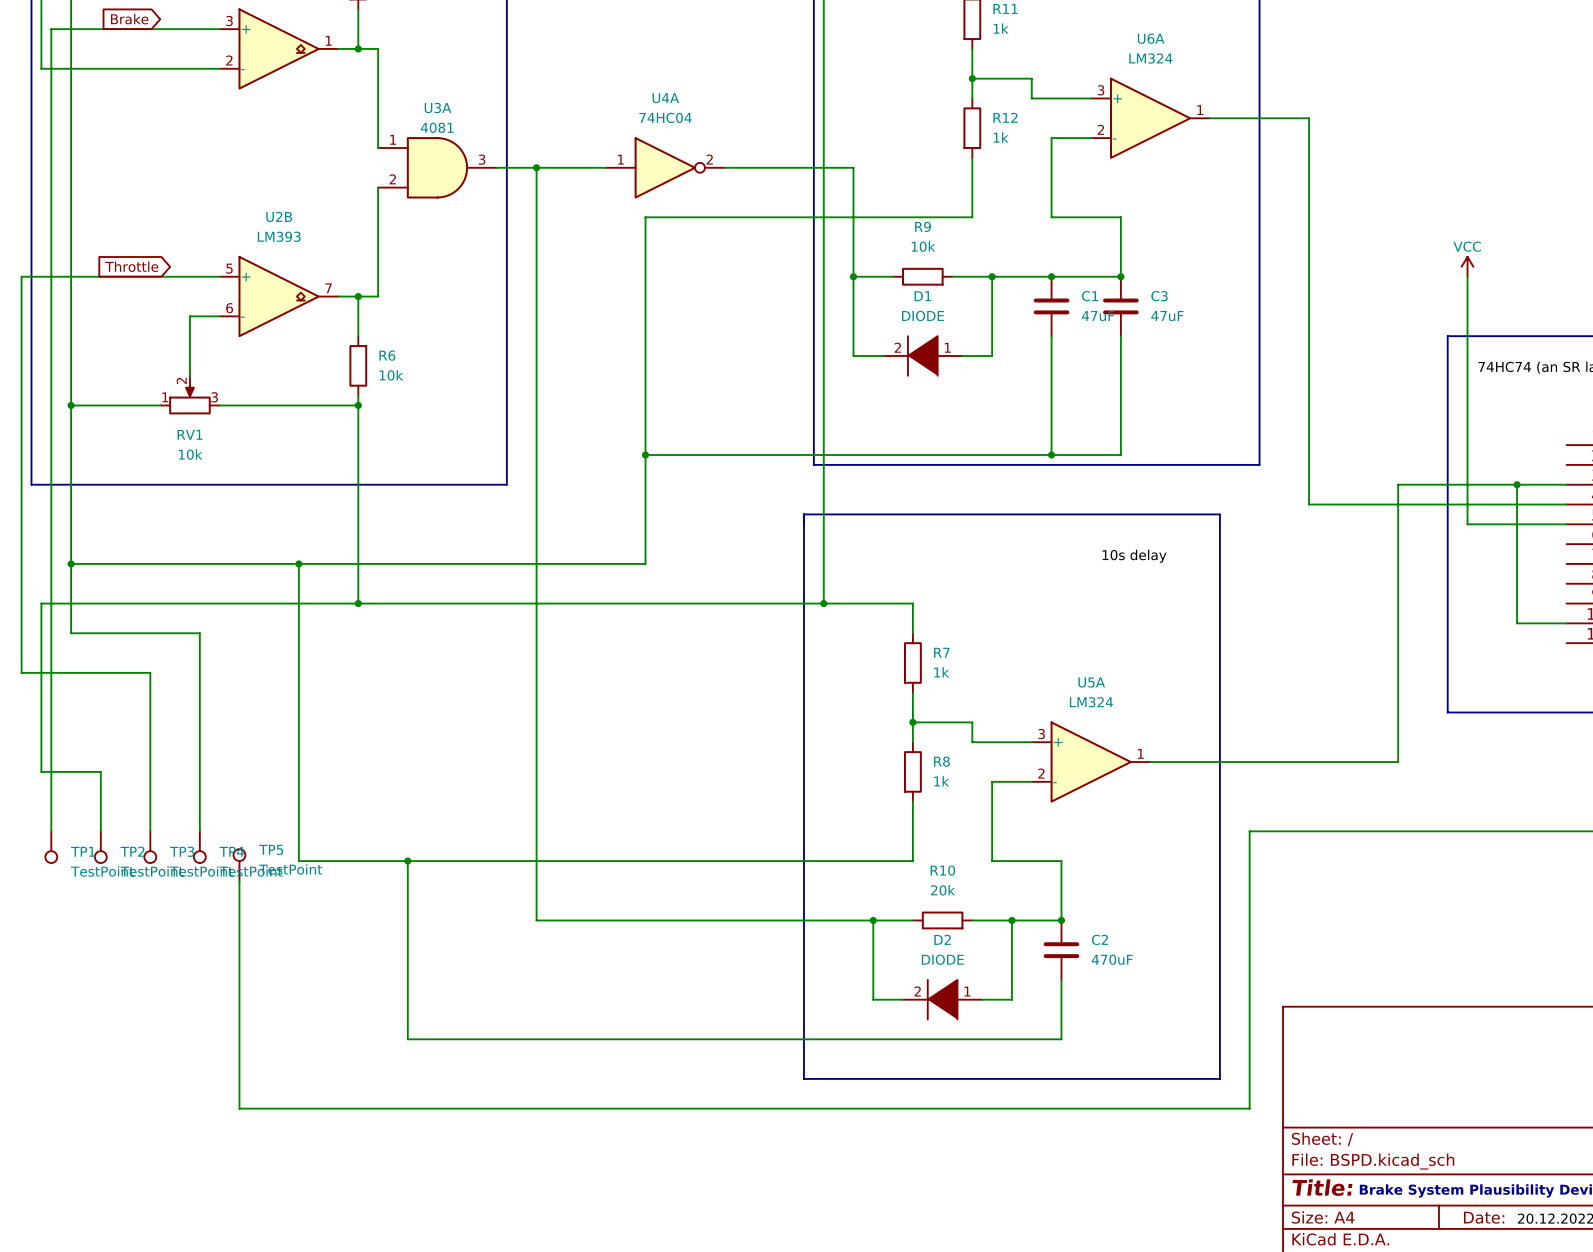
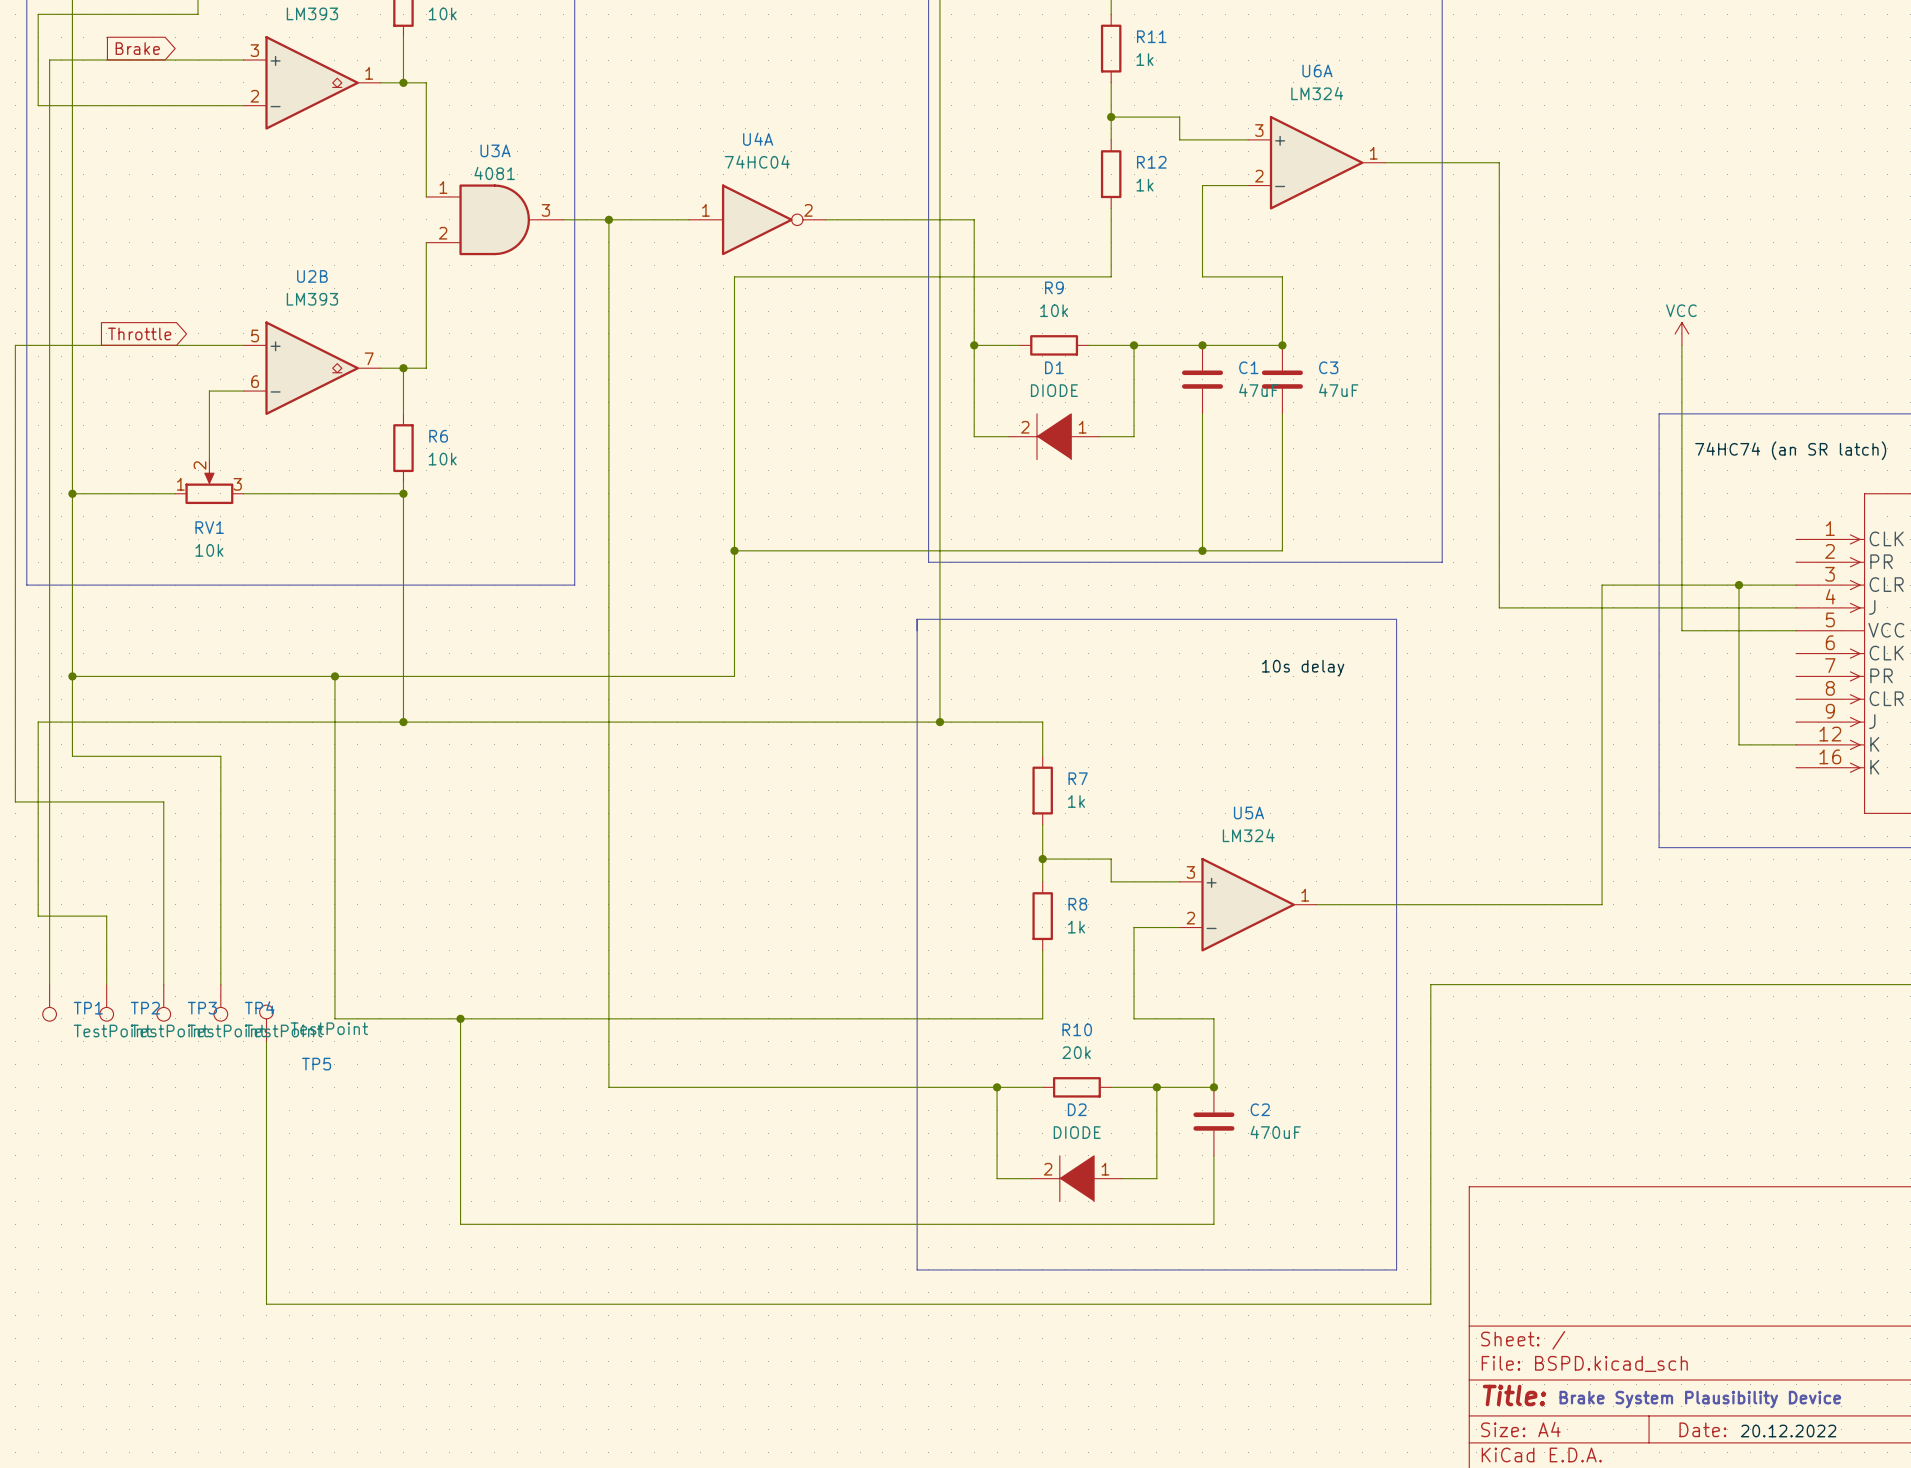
TP5 name position: TP5 (271, 849) -> TP5 (316, 1064)

